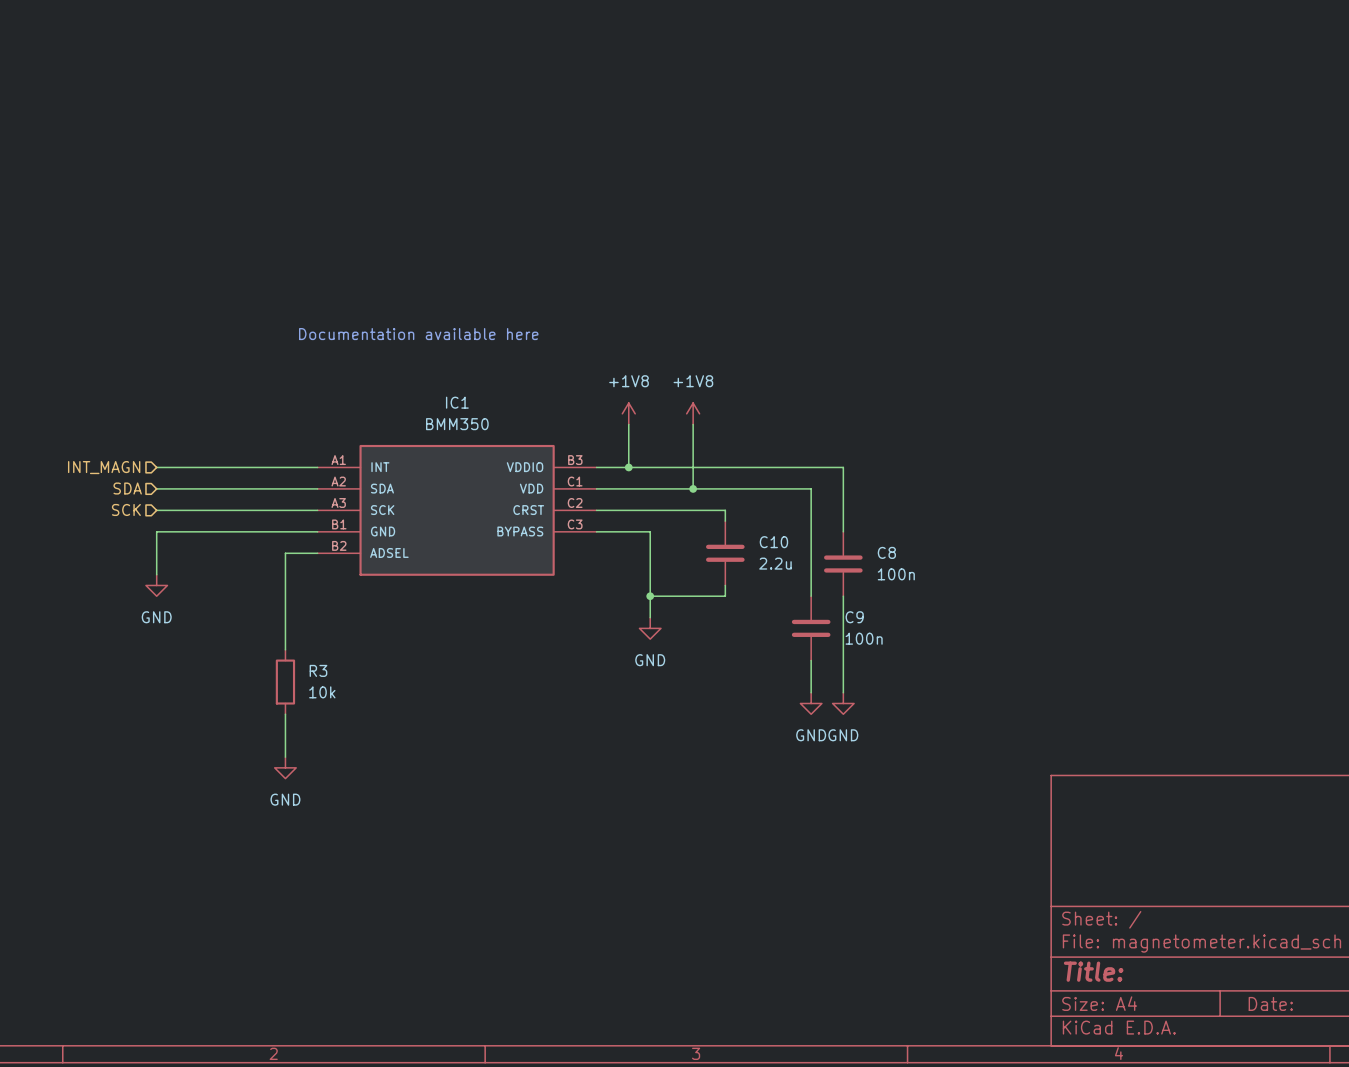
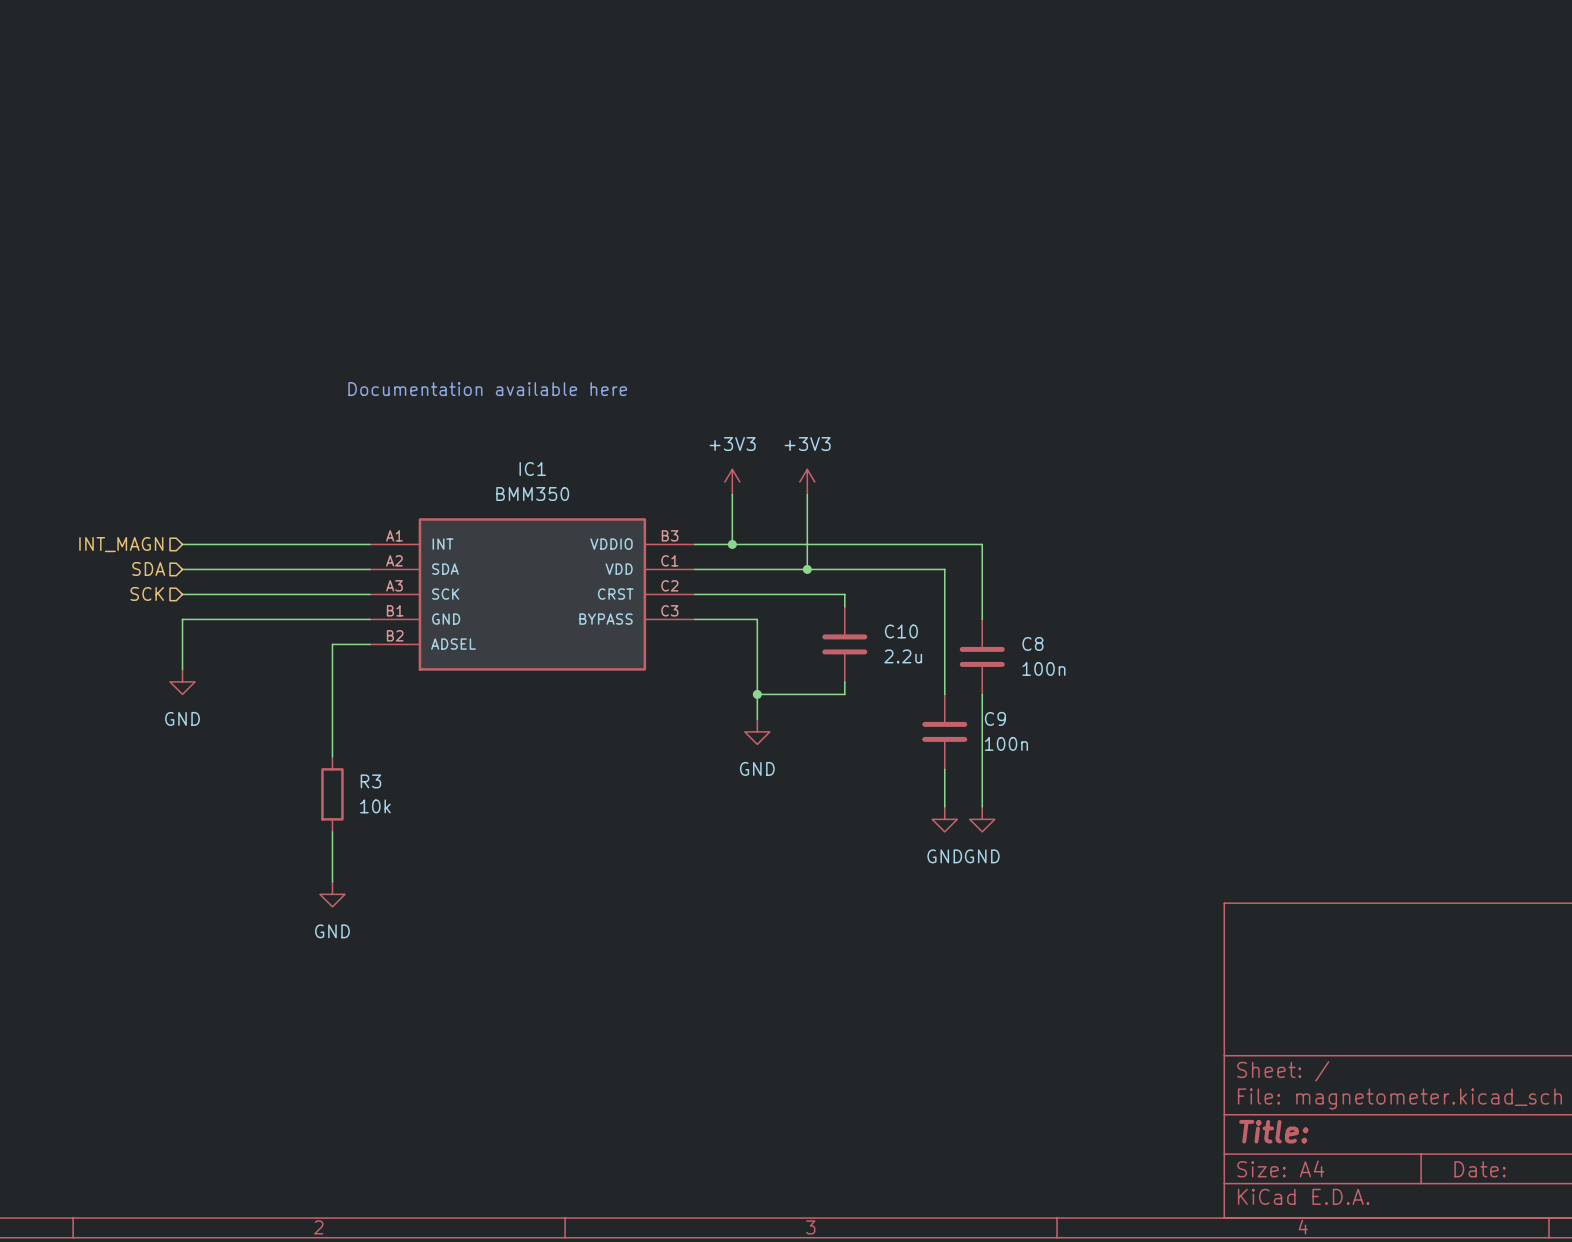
power symbol: +1V8 (628, 413) -> +3V3 (732, 481)
power symbol: +1V8 (693, 413) -> +3V3 (807, 481)

